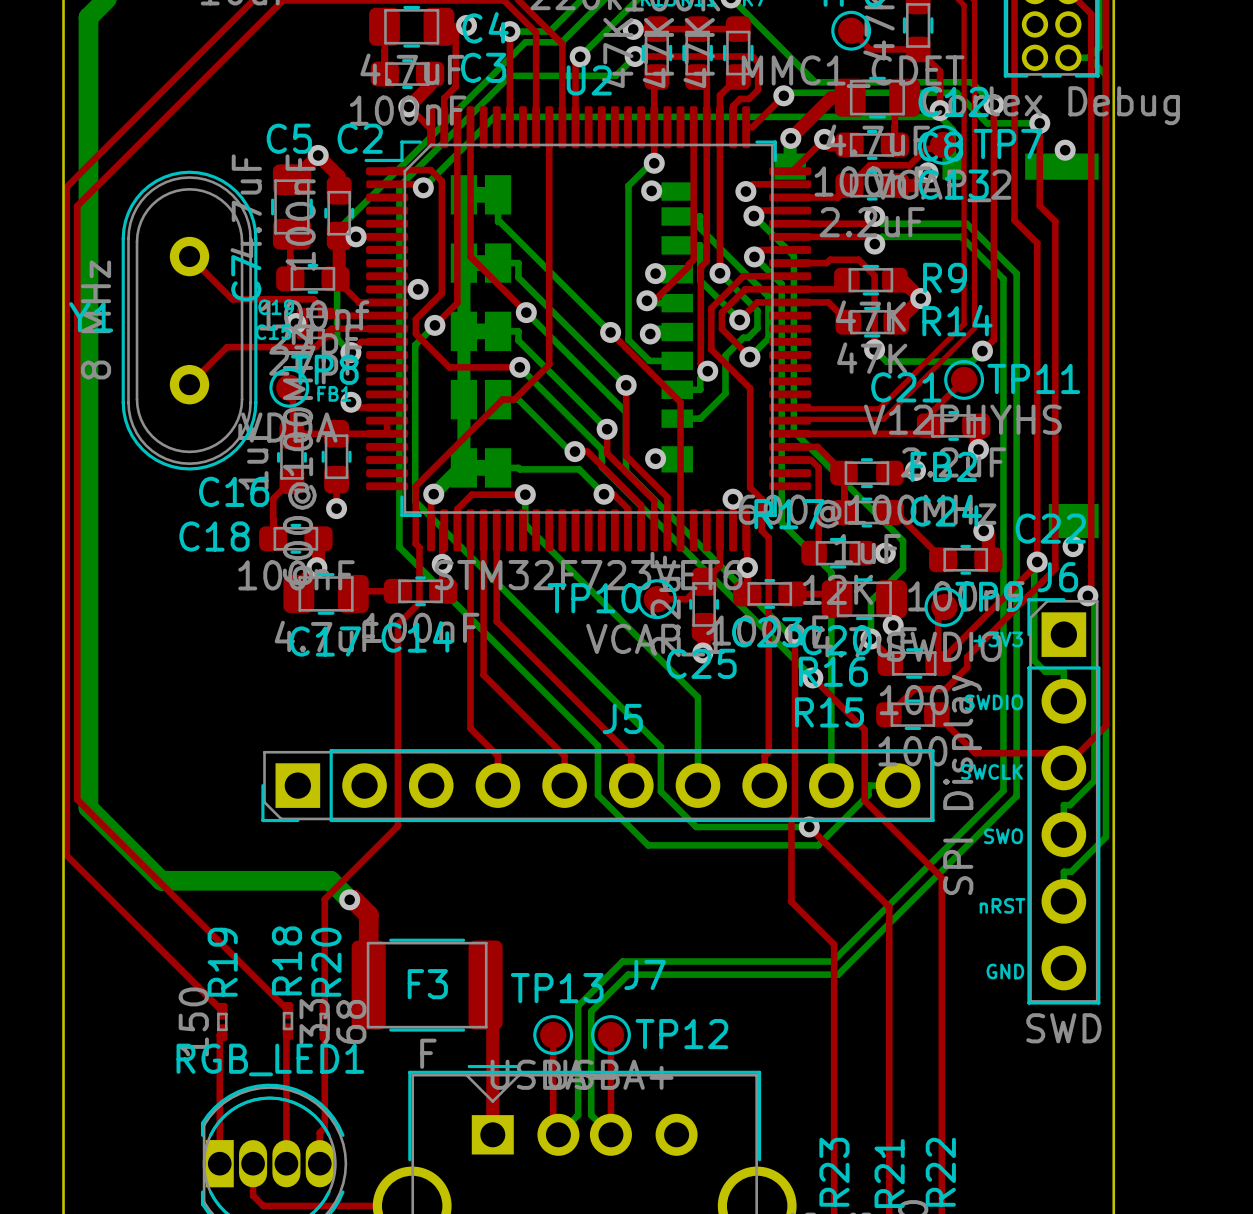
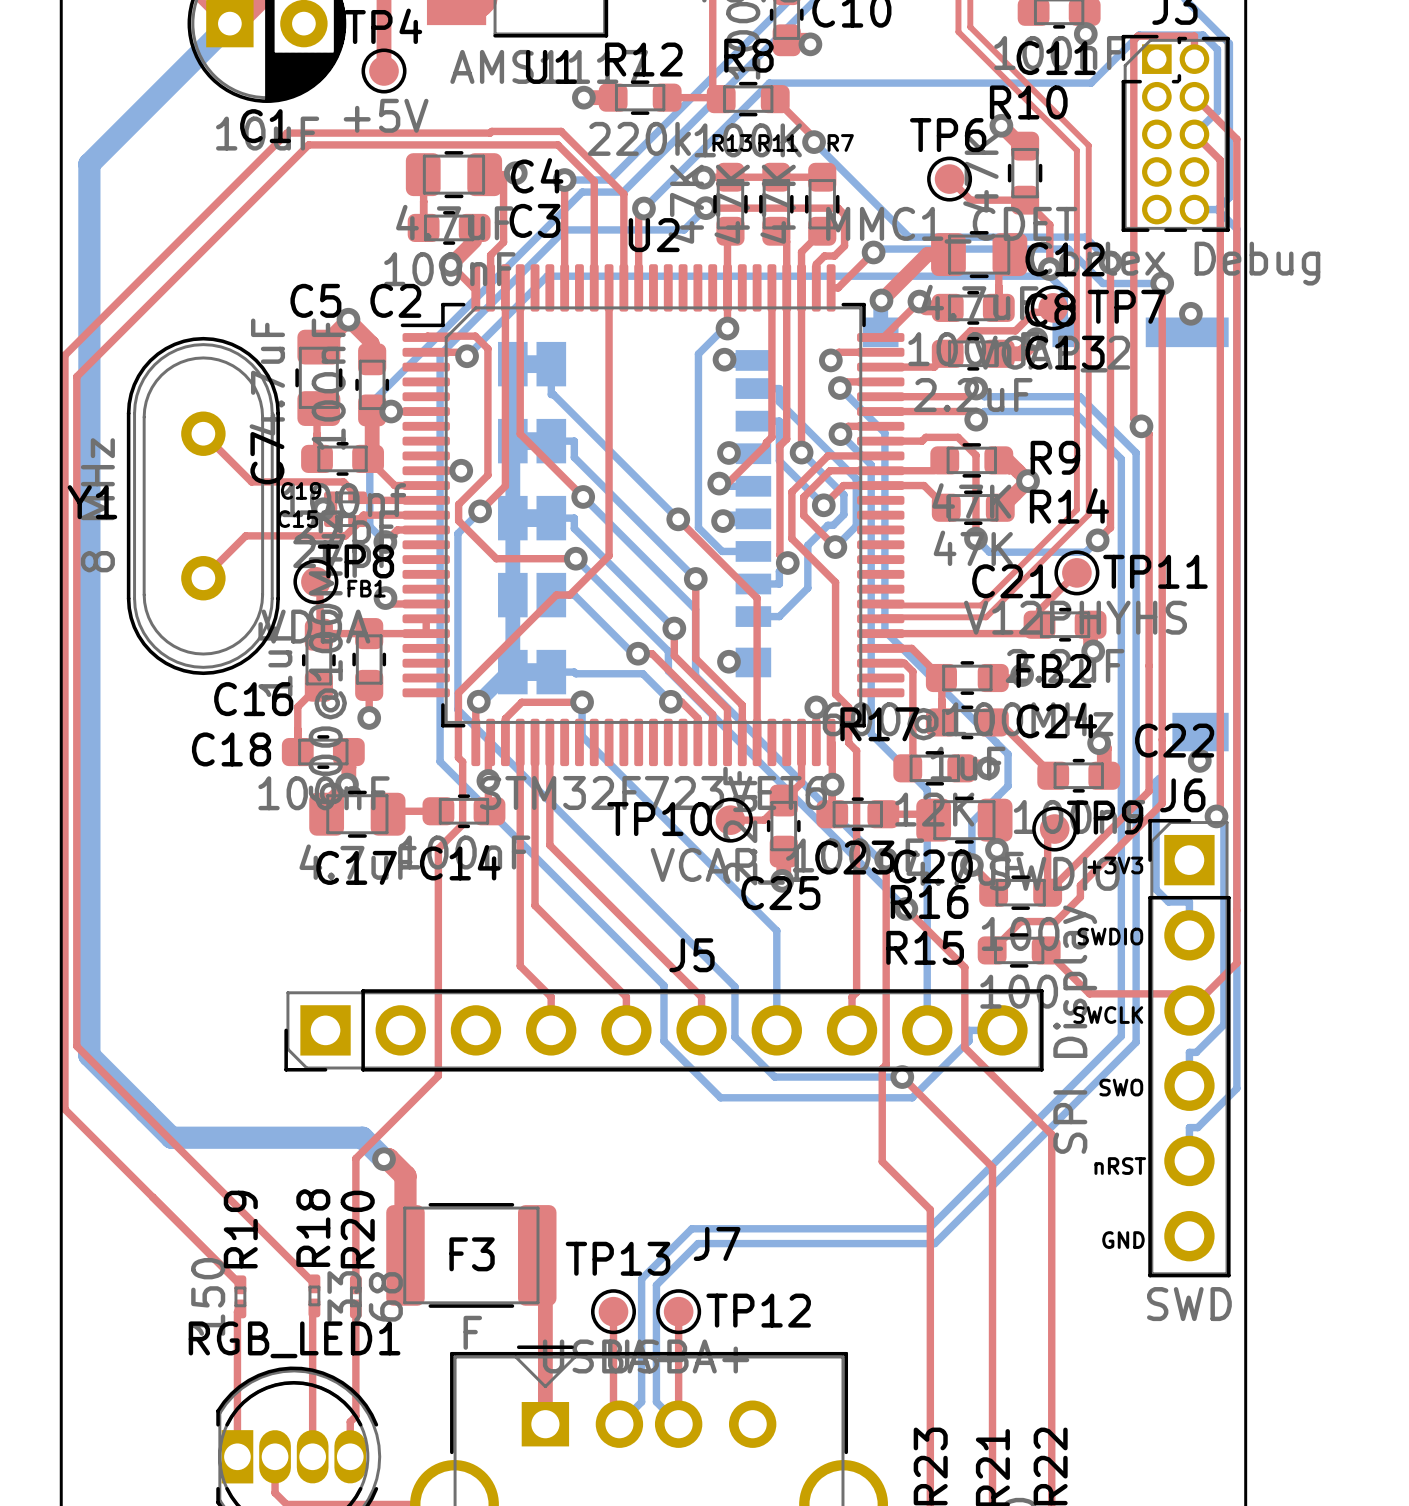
top track: (1039, 205) (1055, 221) (1055, 568) (1039, 584) -> (1162, 376) (1162, 803)
top track: (1014, 220) (1037, 243) (1037, 564) (1028, 573) -> (1133, 392) (1133, 418) (1149, 433) (1149, 791)
via: none -> (1141, 426)
via: (1037, 562) -> none

